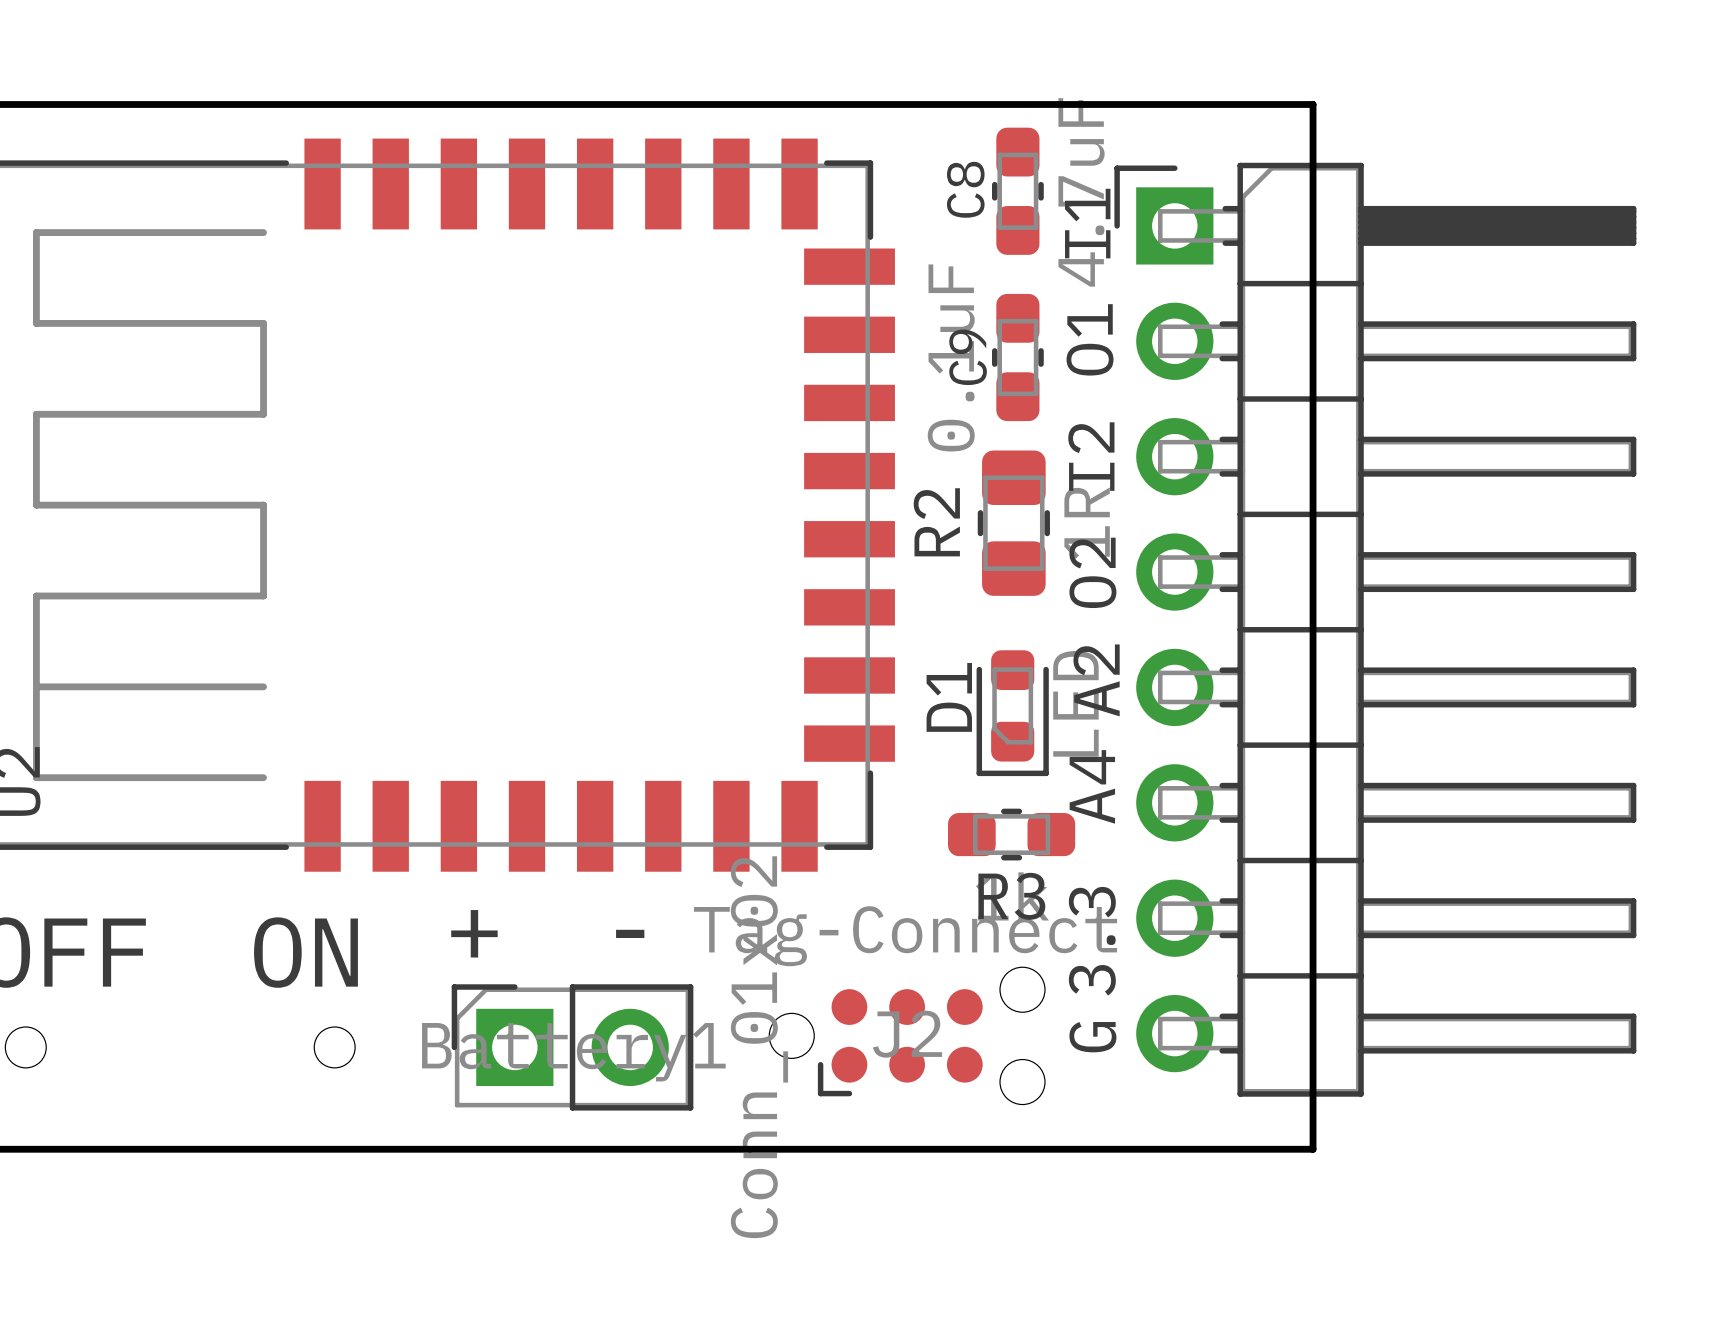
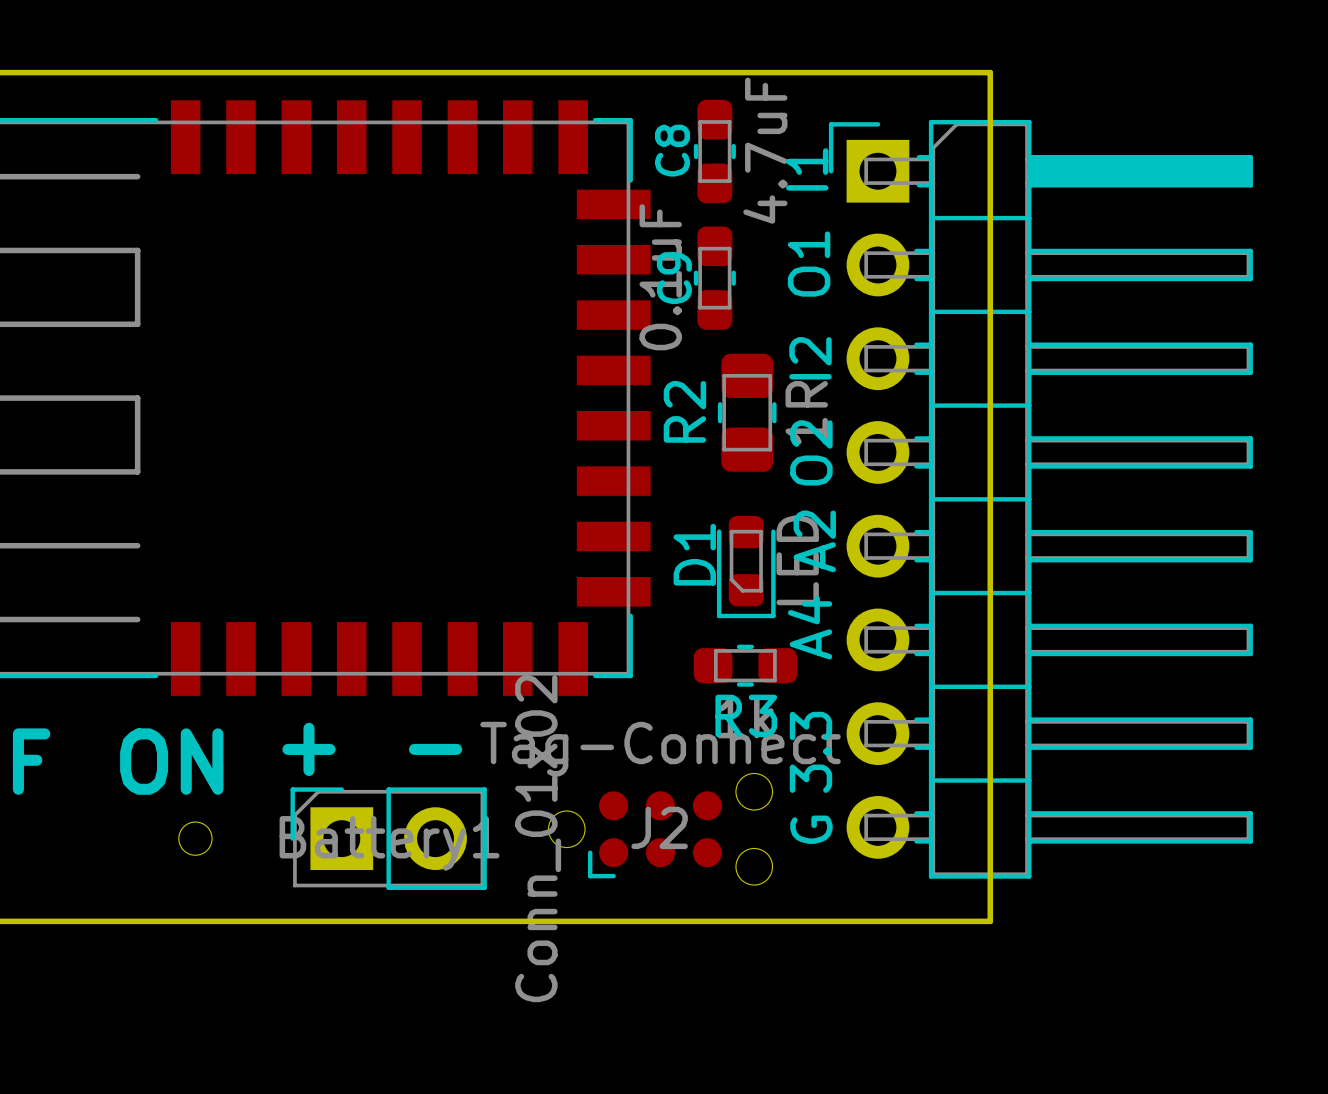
C8 position: (1017, 191) -> (714, 151)
C9 position: (1017, 357) -> (714, 278)

